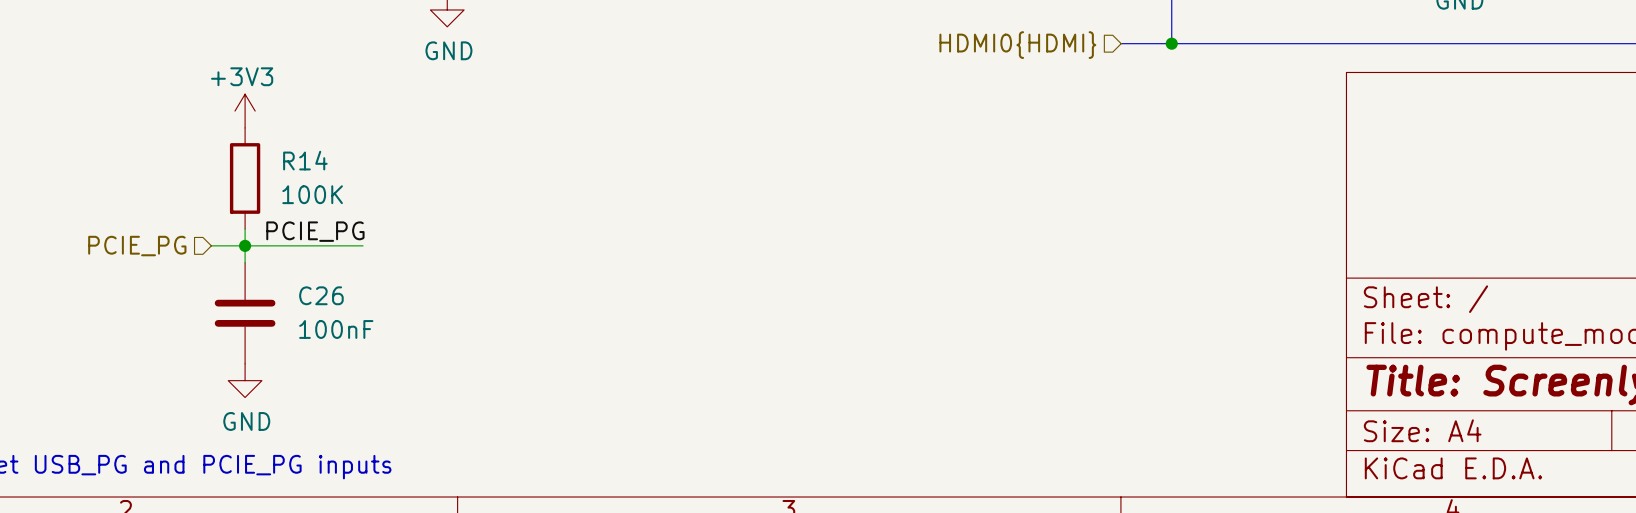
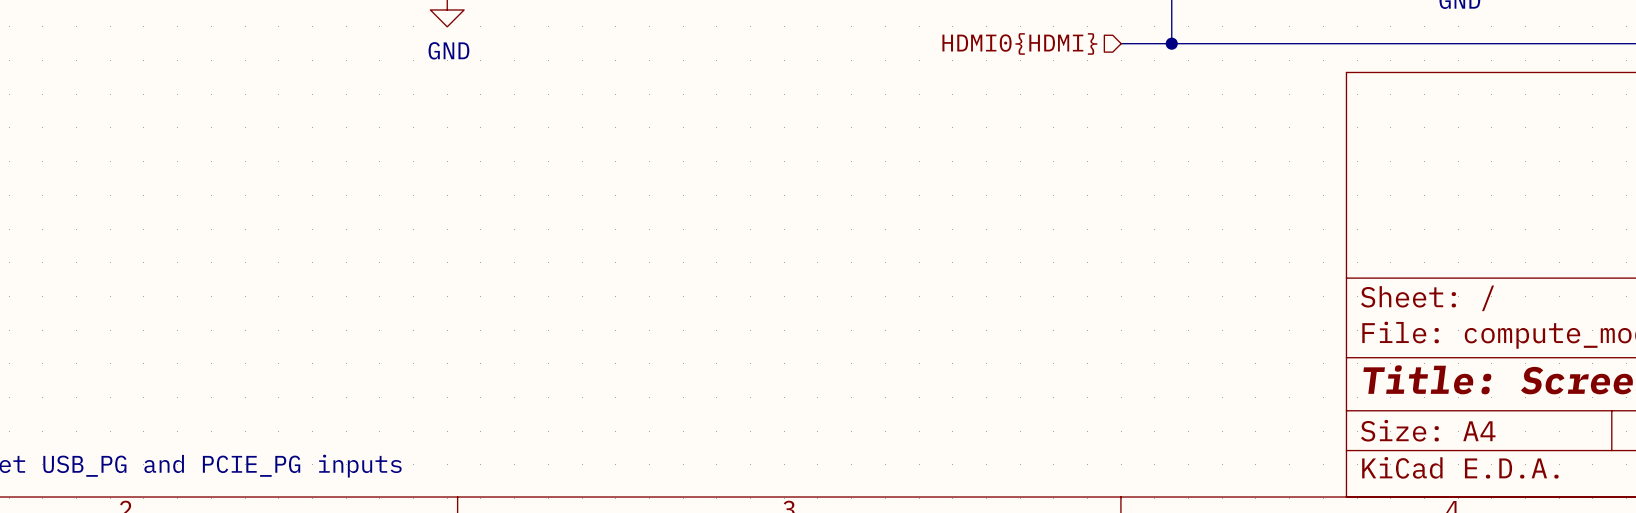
power symbol: +3V3 (245, 111) -> none
R14: 100K (245, 178) -> none
wire: (245, 229) (245, 262) -> none
label: PCIE_PG (315, 231) -> none
wire: (211, 245) (363, 245) -> none
junction: (245, 245) -> none
hierarchical label: PCIE_PG (137, 246) -> none
C26: 100nF (245, 313) -> none
power symbol: GND (245, 380) -> none

